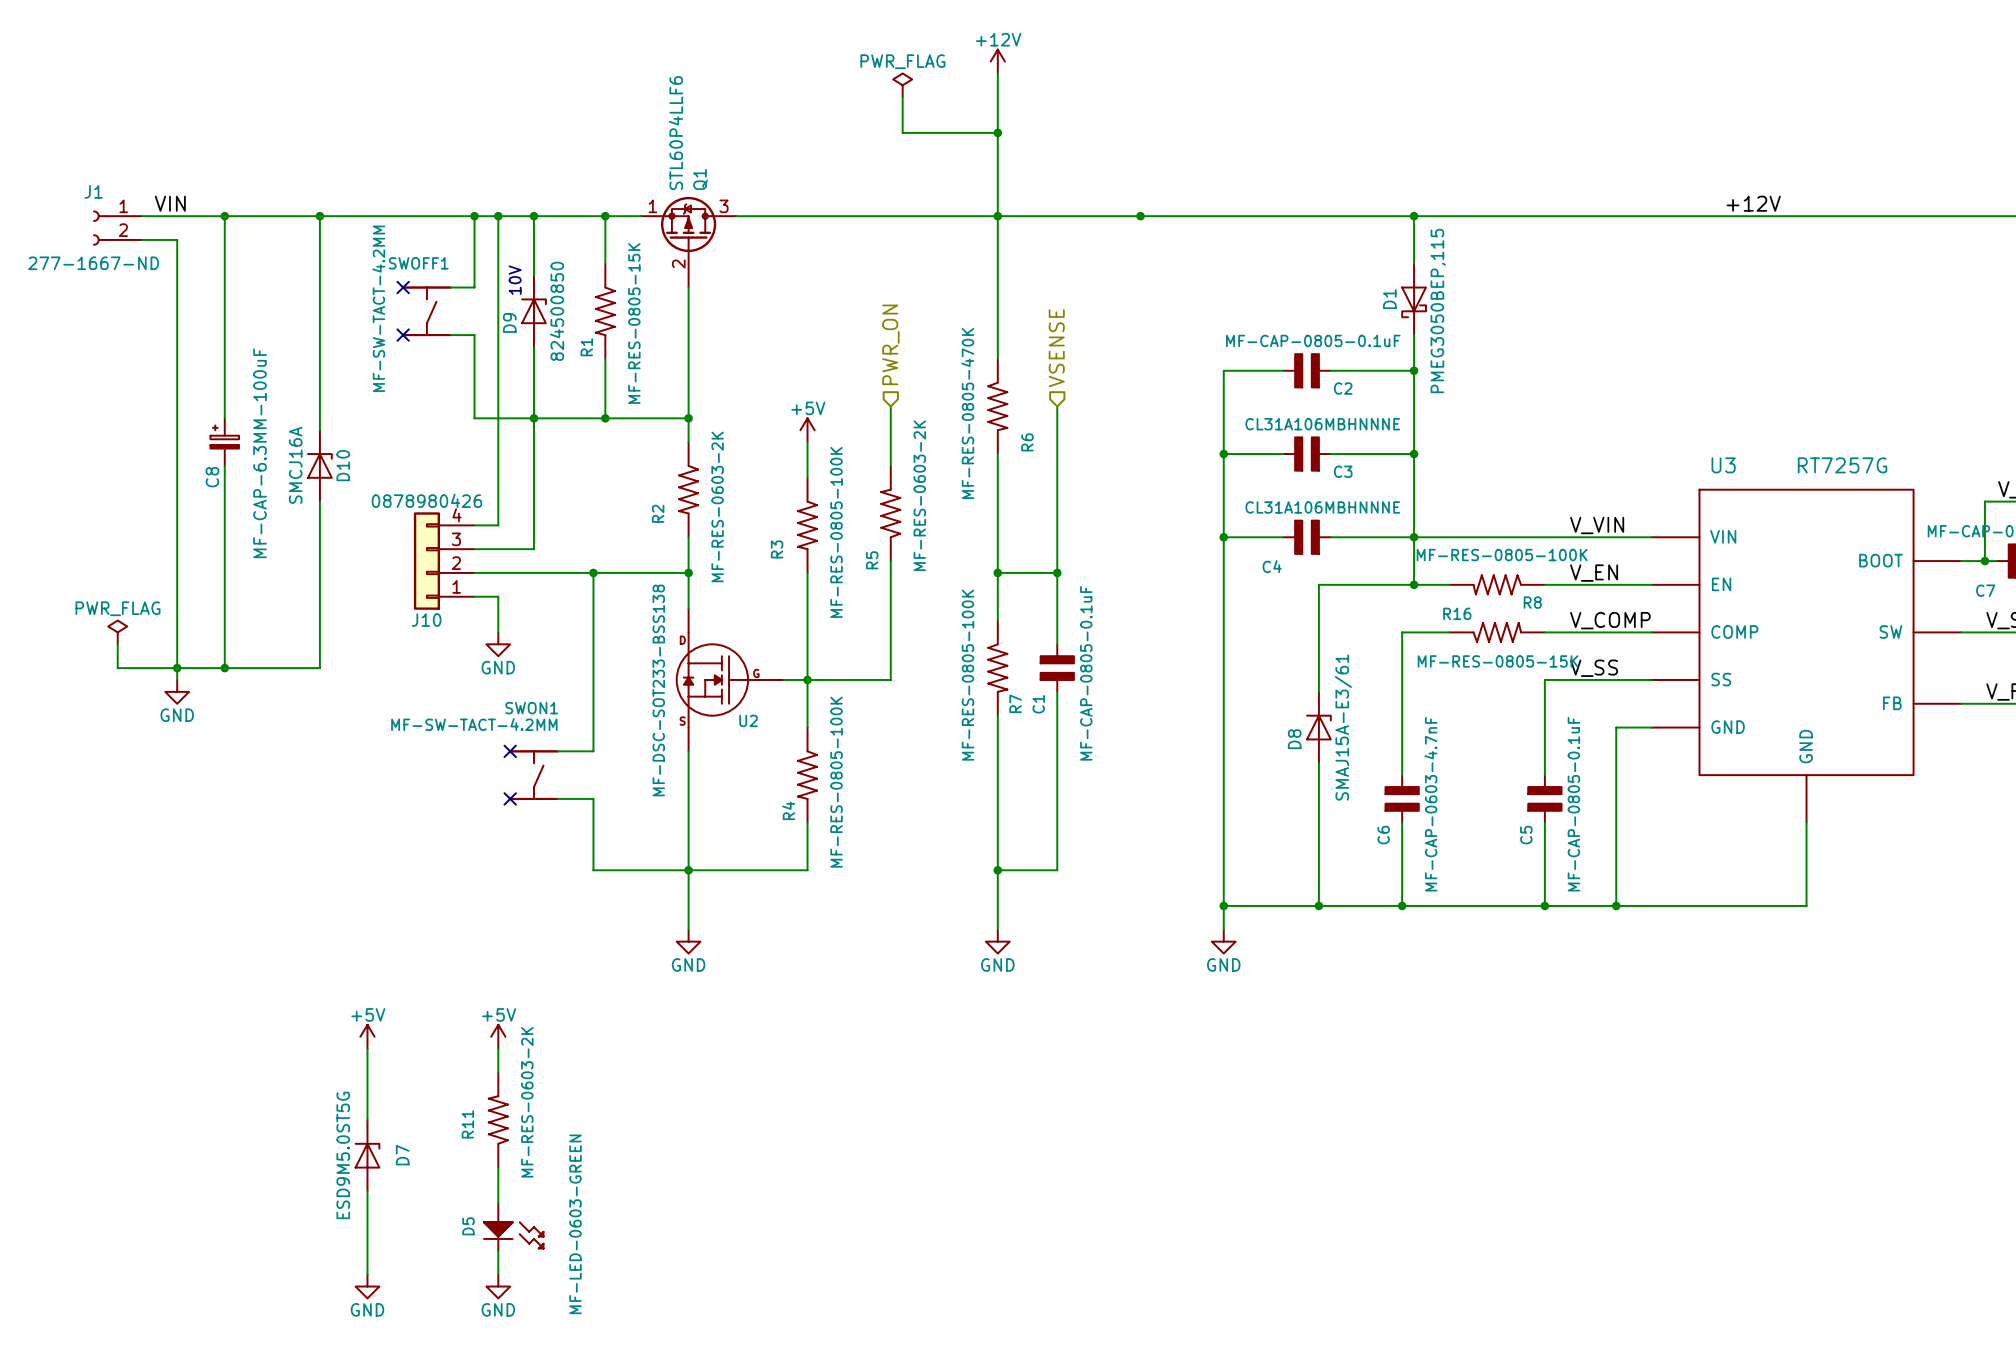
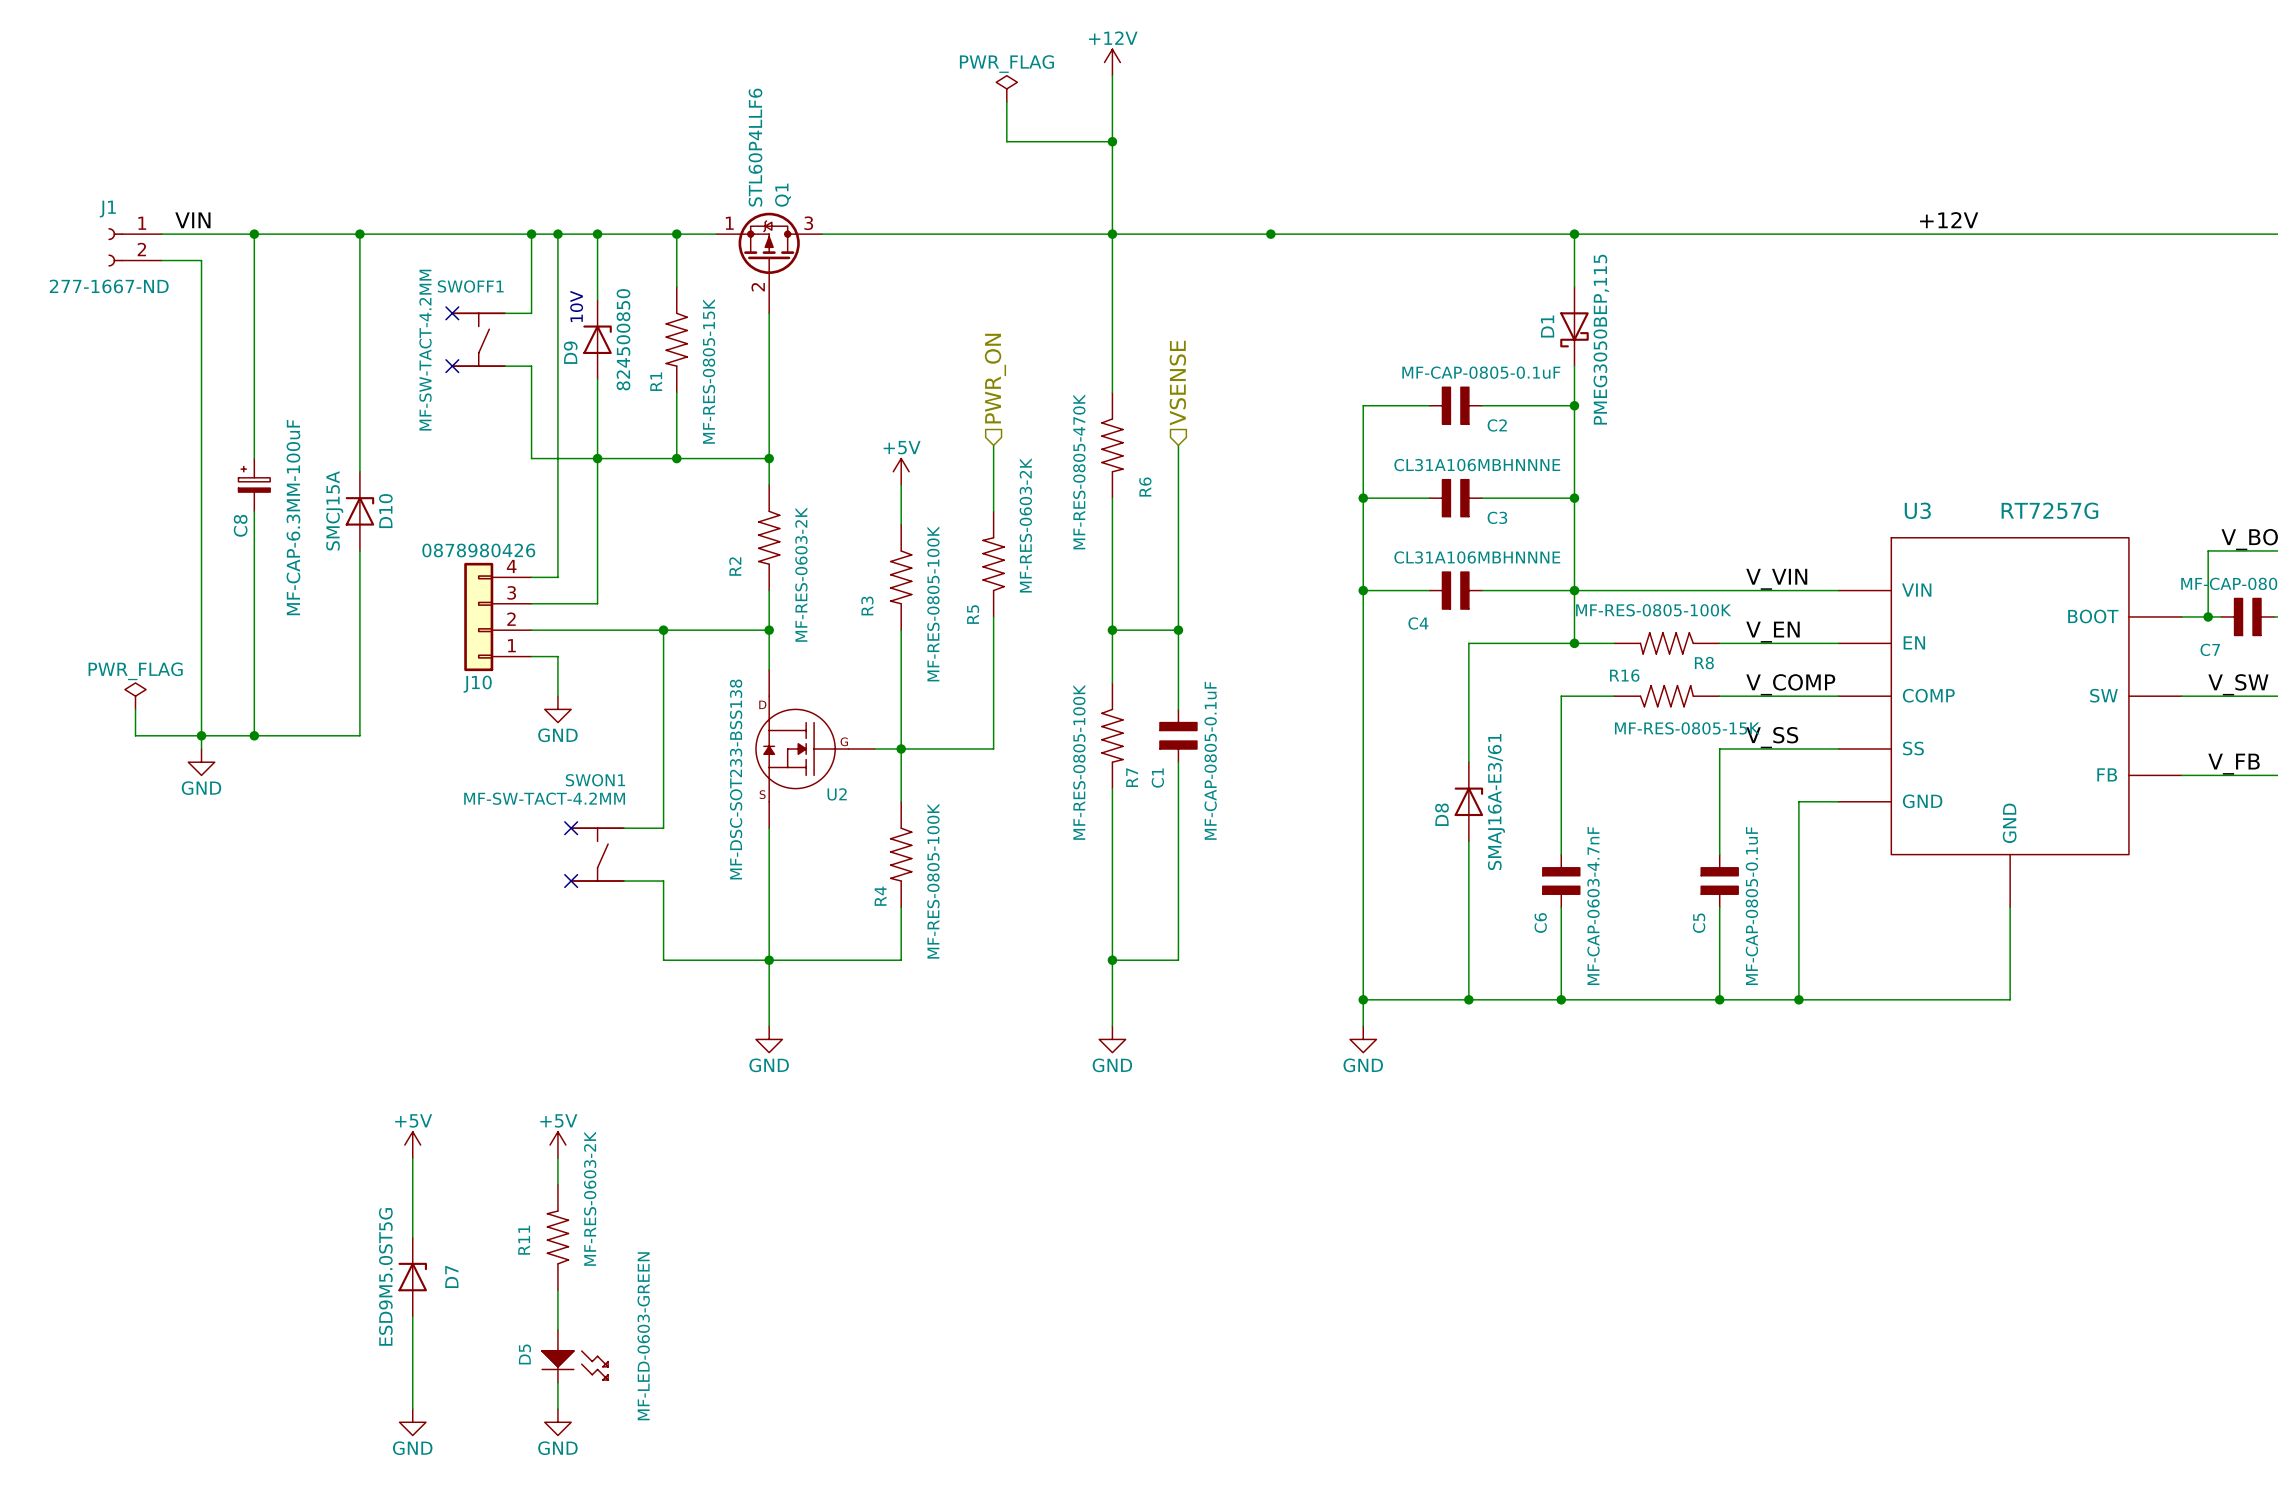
D10 value: SMCJ16A (295, 465) -> SMCJ15A (334, 510)
D8 value: SMAJ15A-E3/61 (1343, 727) -> SMAJ16A-E3/61 (1496, 802)

